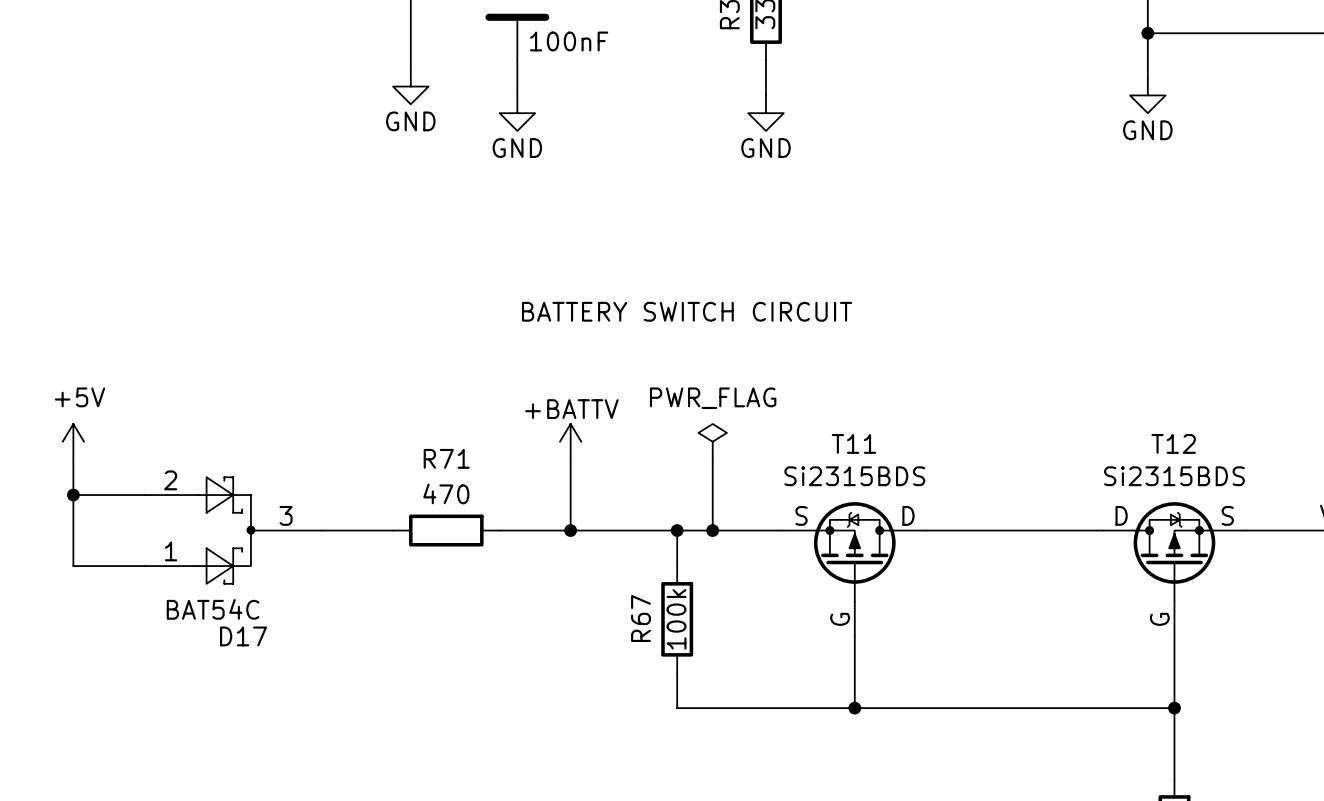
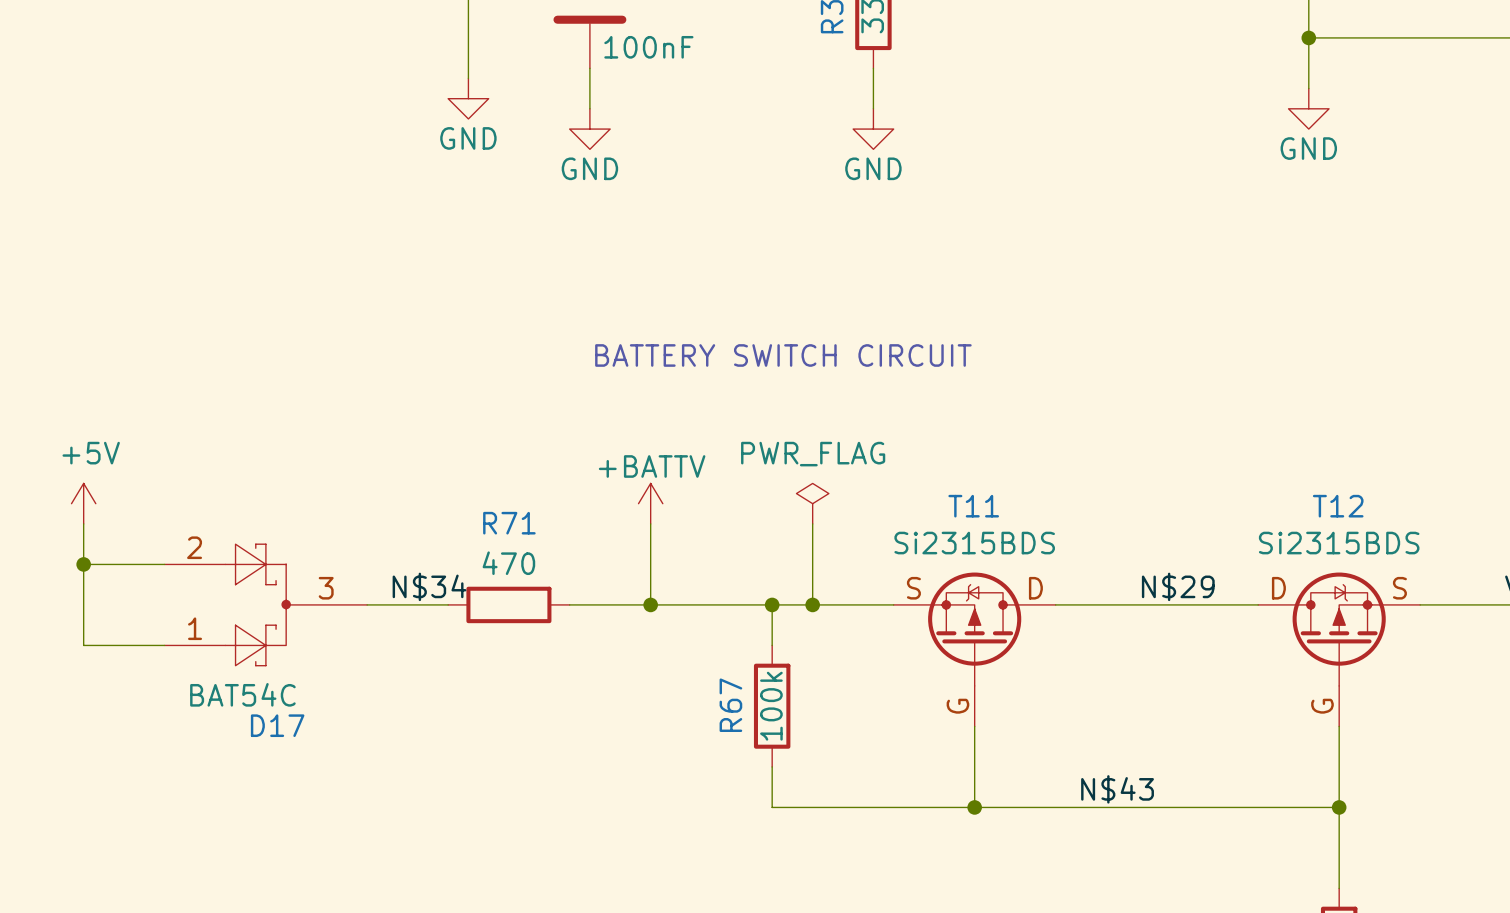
label: none -> N$34 (429, 586)
label: none -> N$29 (1178, 586)
label: none -> N$43 (1117, 789)

